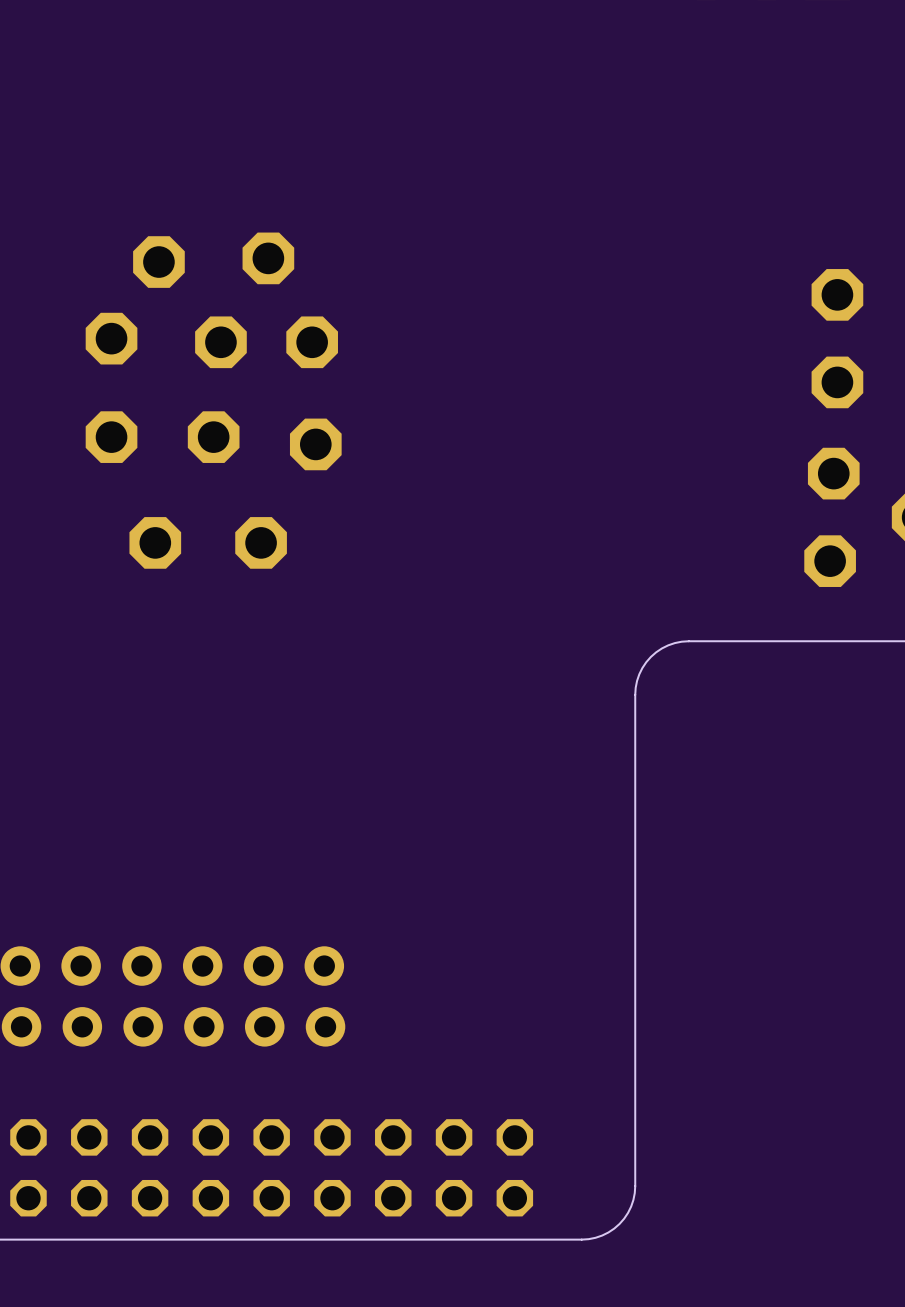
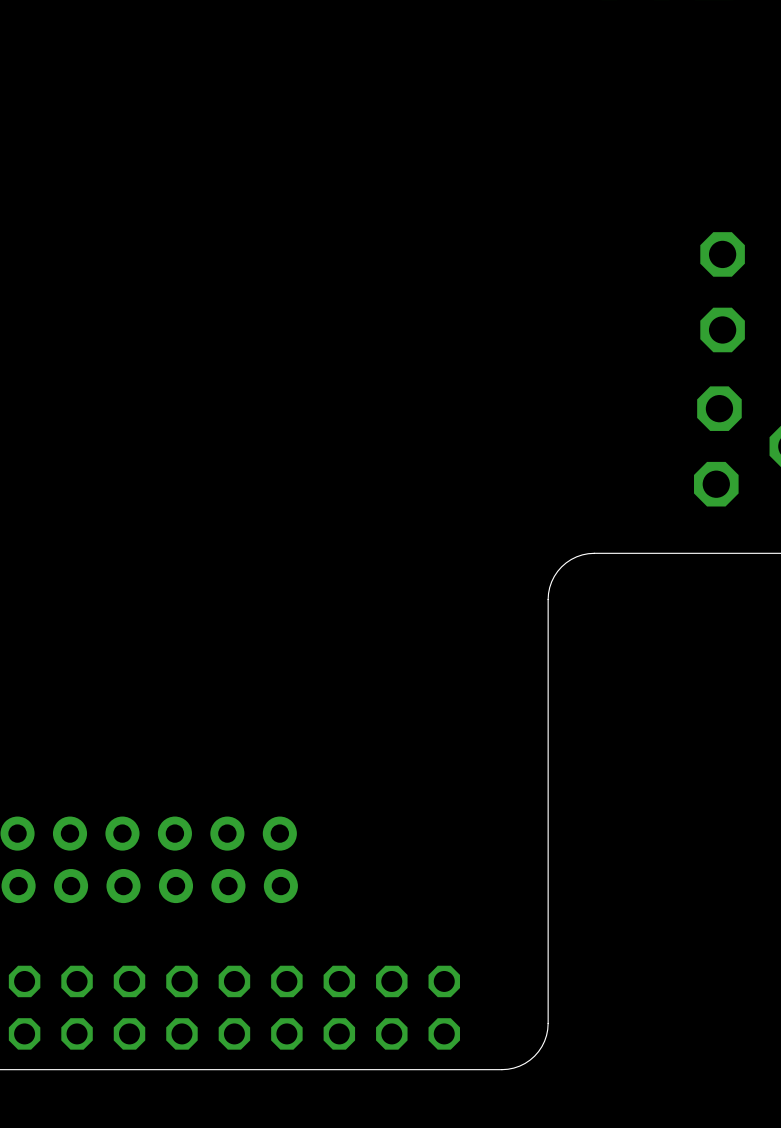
part: (268, 258) -> none
part: (158, 262) -> none
part: (111, 338) -> none
part: (220, 342) -> none
part: (312, 342) -> none
part: (111, 437) -> none
part: (213, 437) -> none
part: (315, 444) -> none
part: (155, 542) -> none
part: (261, 542) -> none

